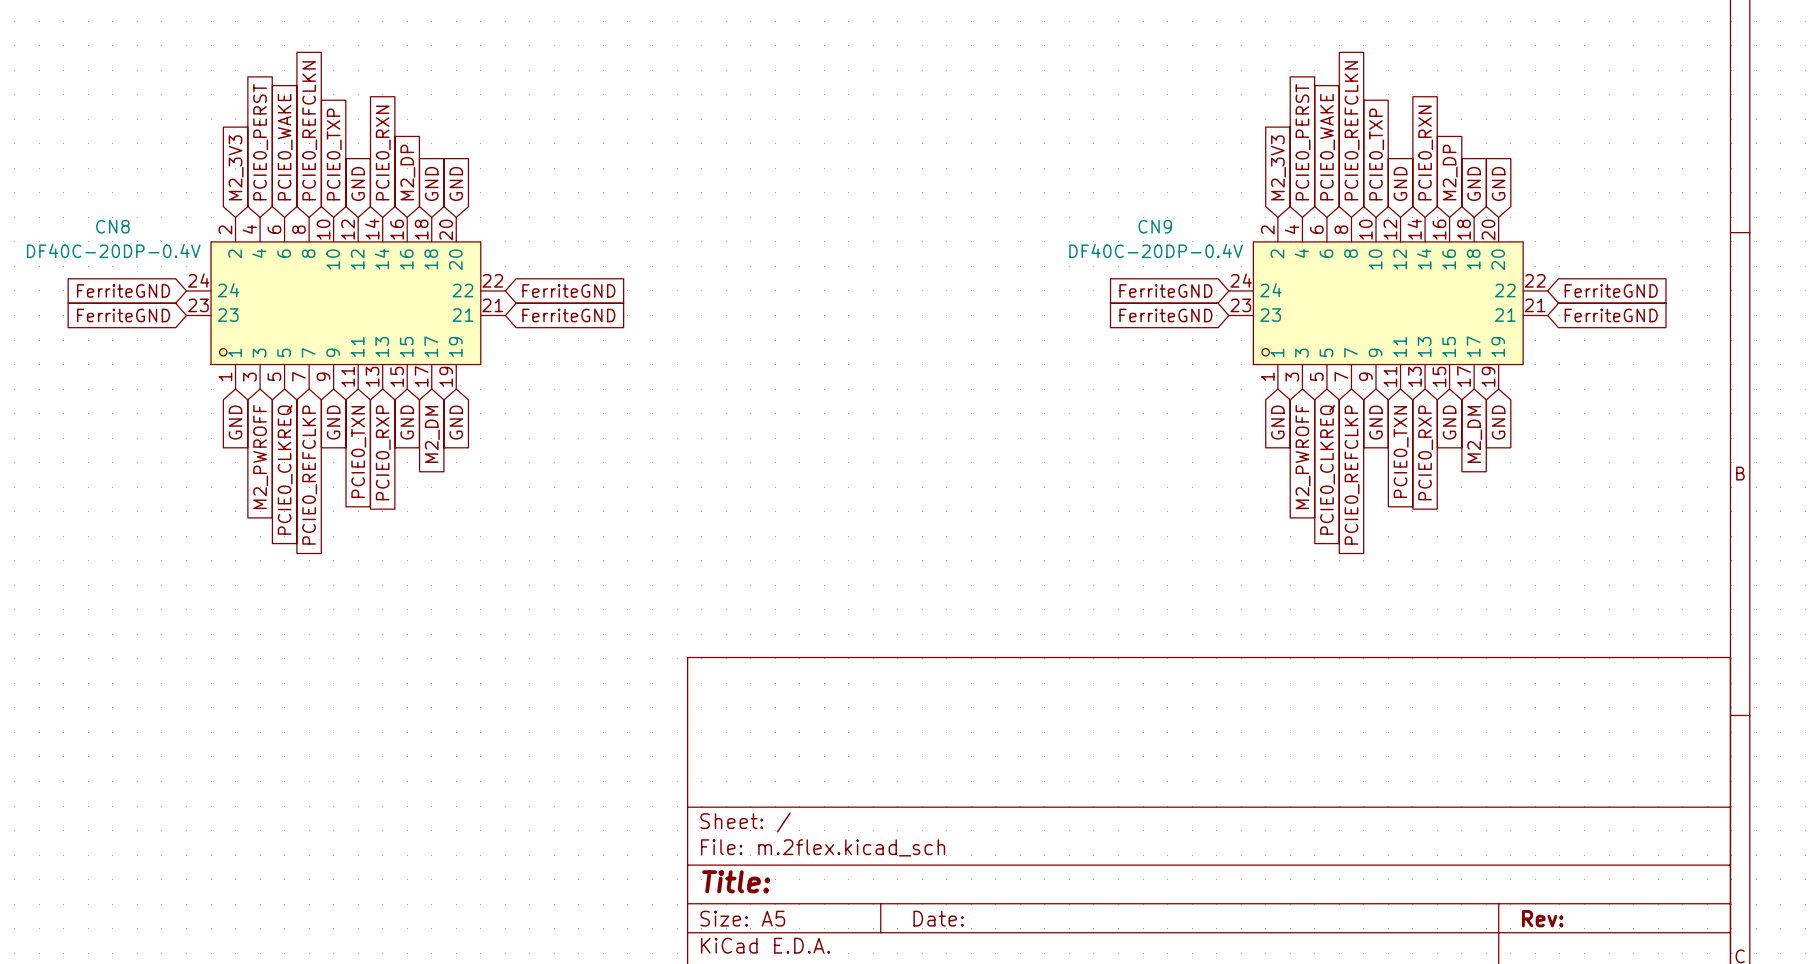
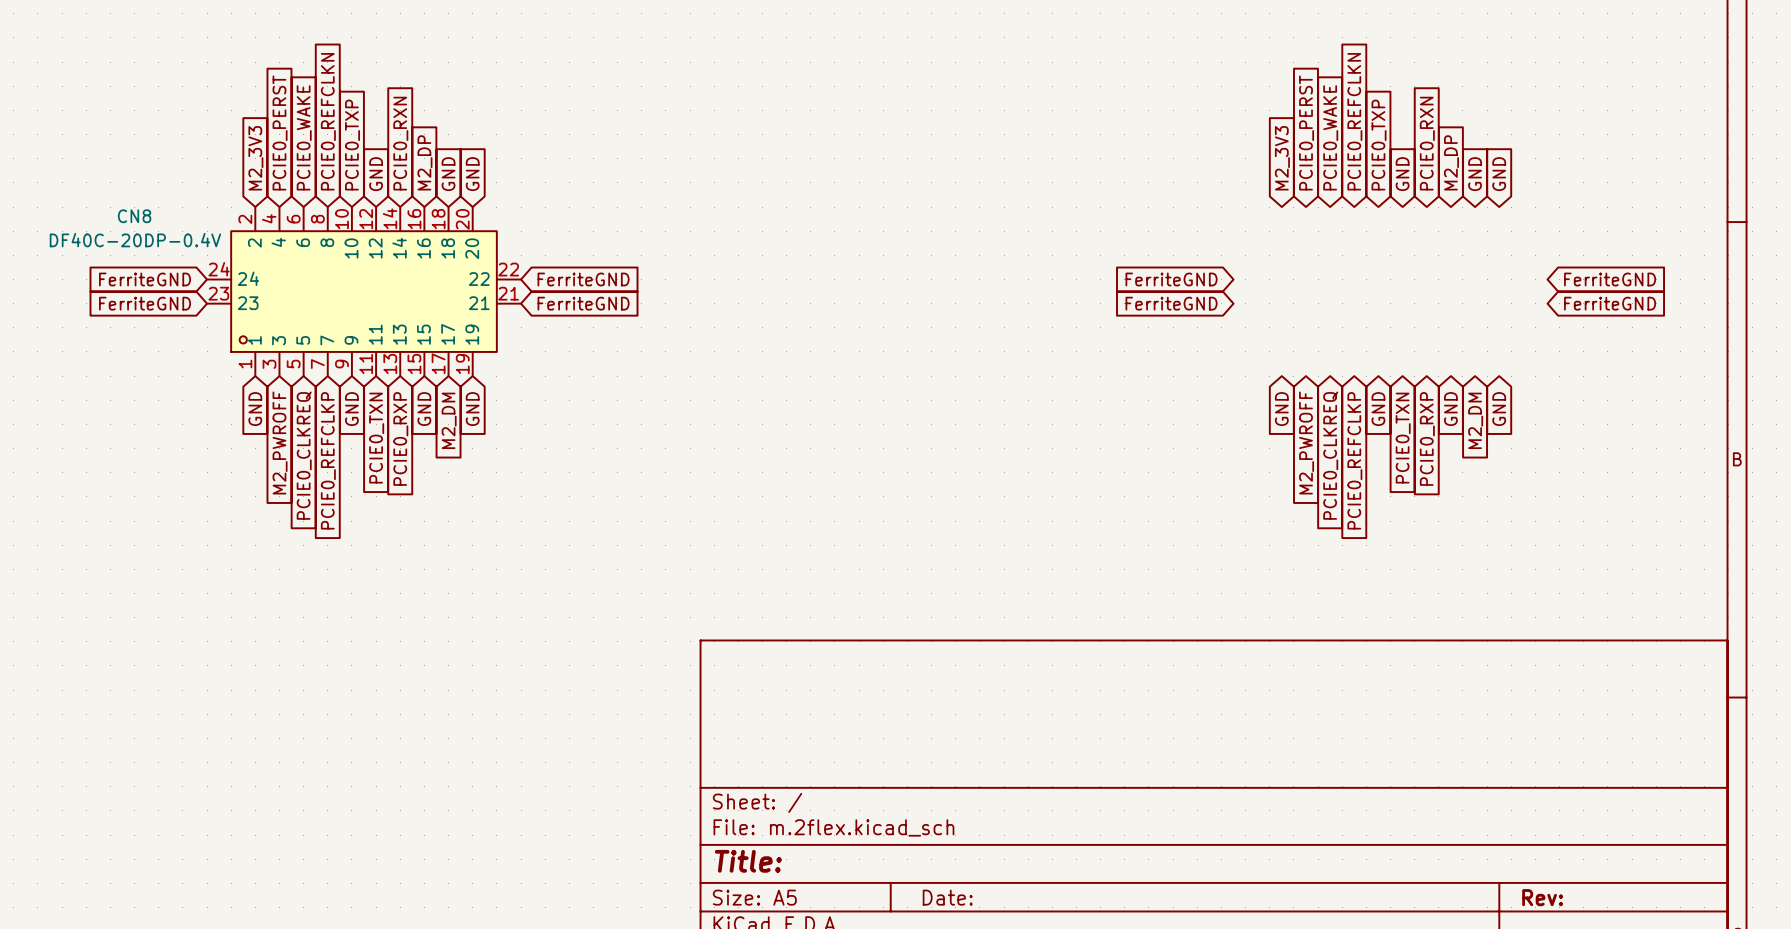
CN9: DF40C-20DP-0.4V (1388, 303) -> none

